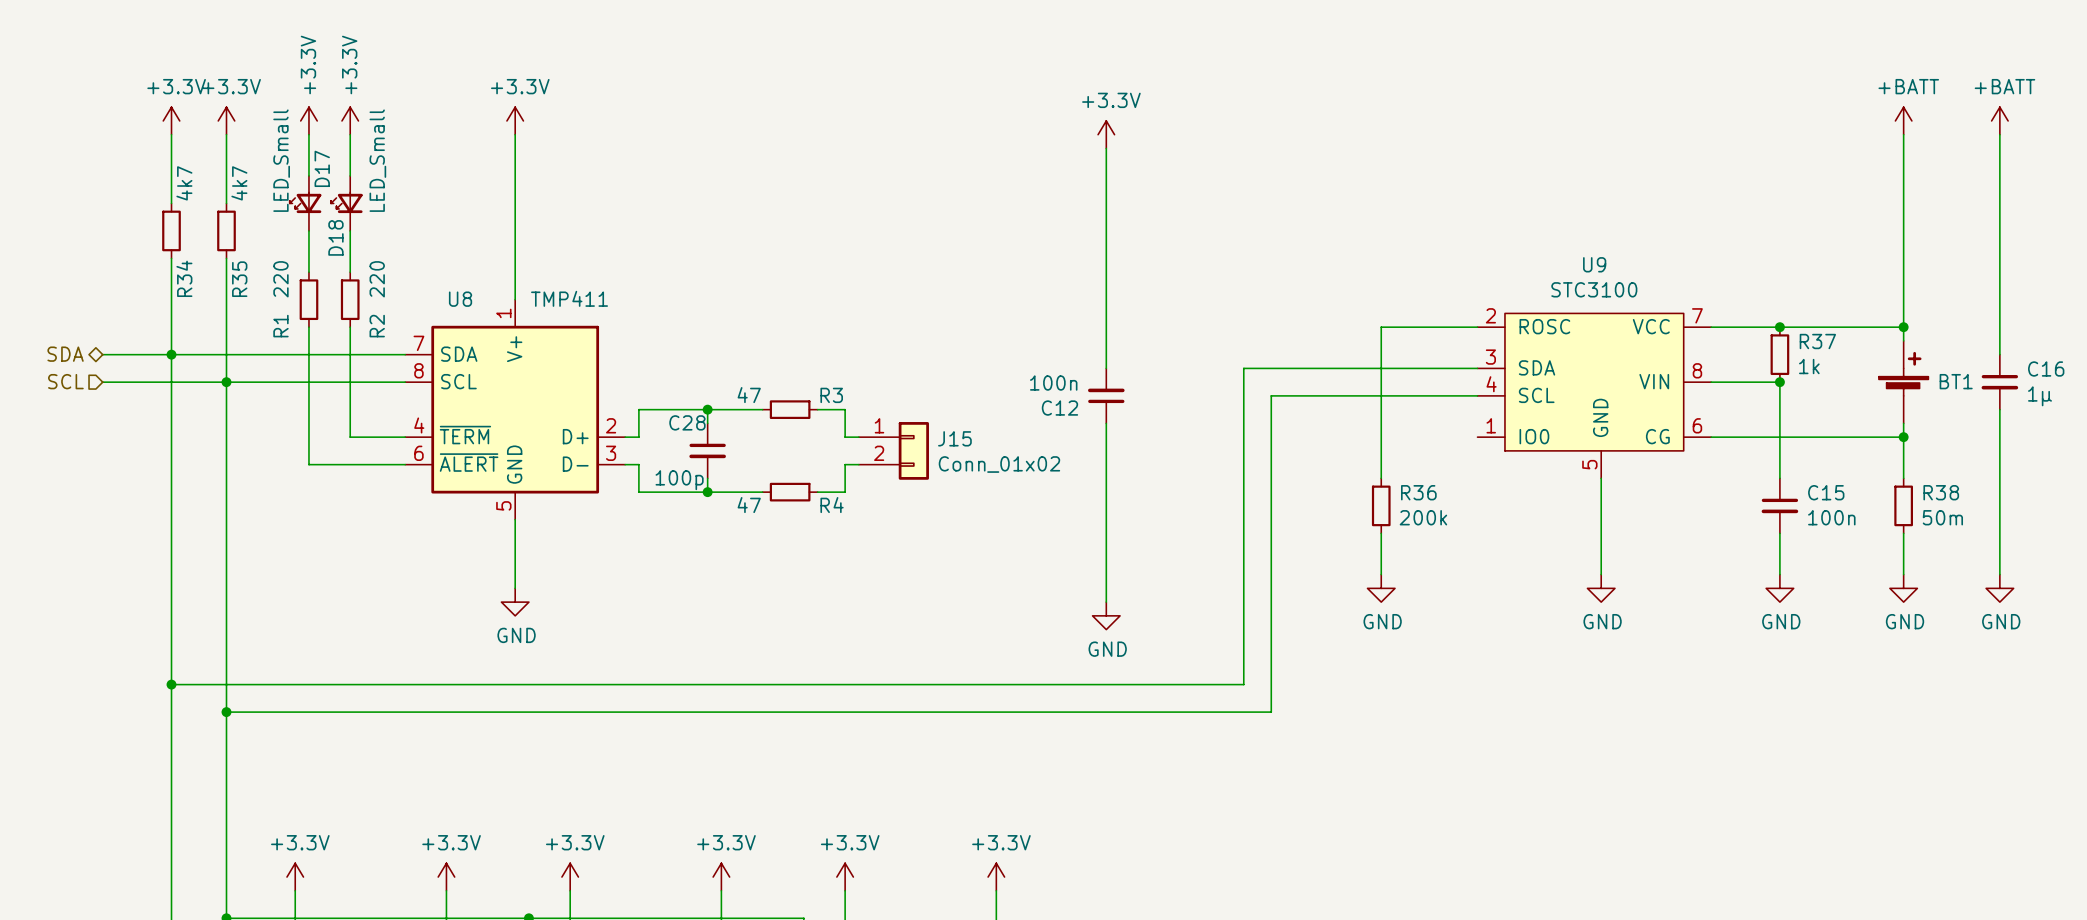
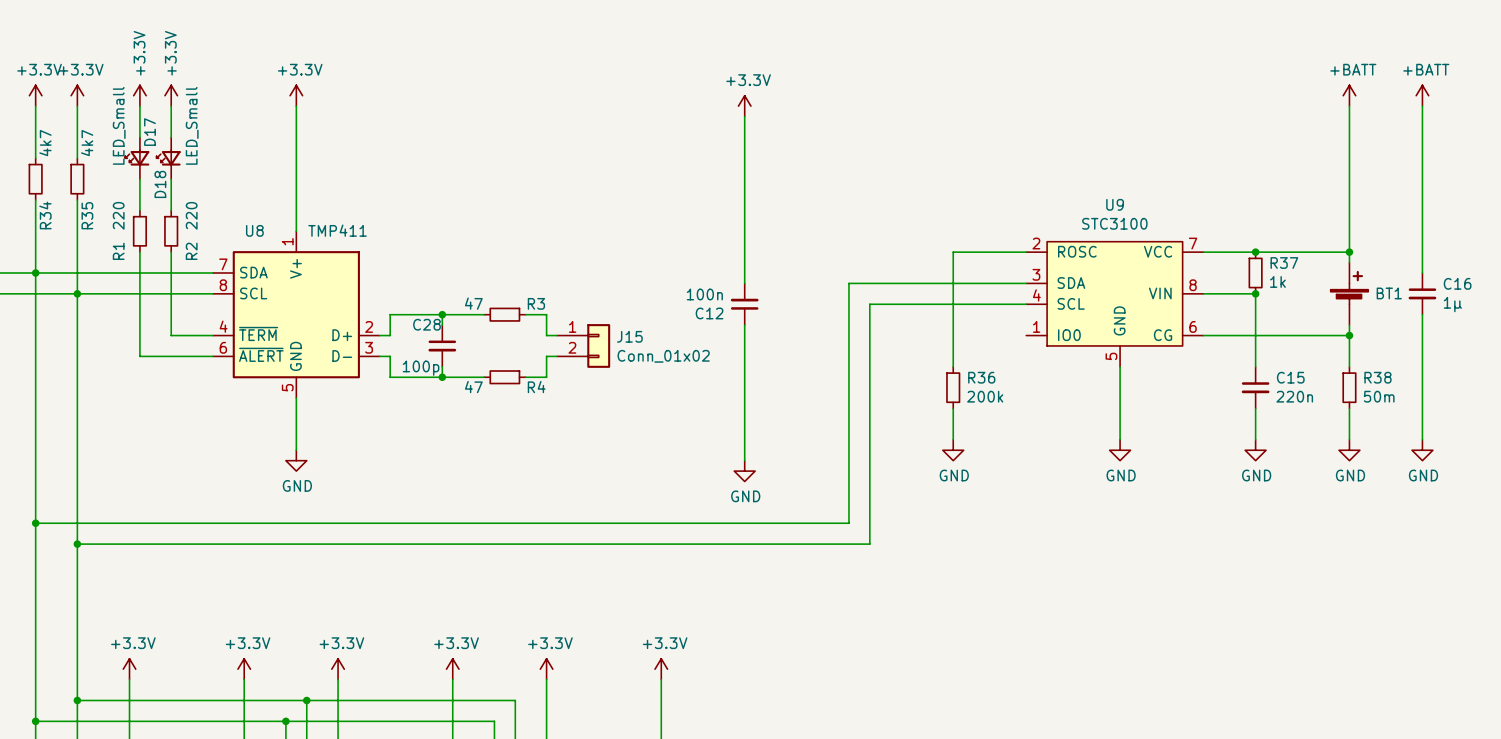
C15 value: 100n (1831, 517) -> 220n (1294, 396)

